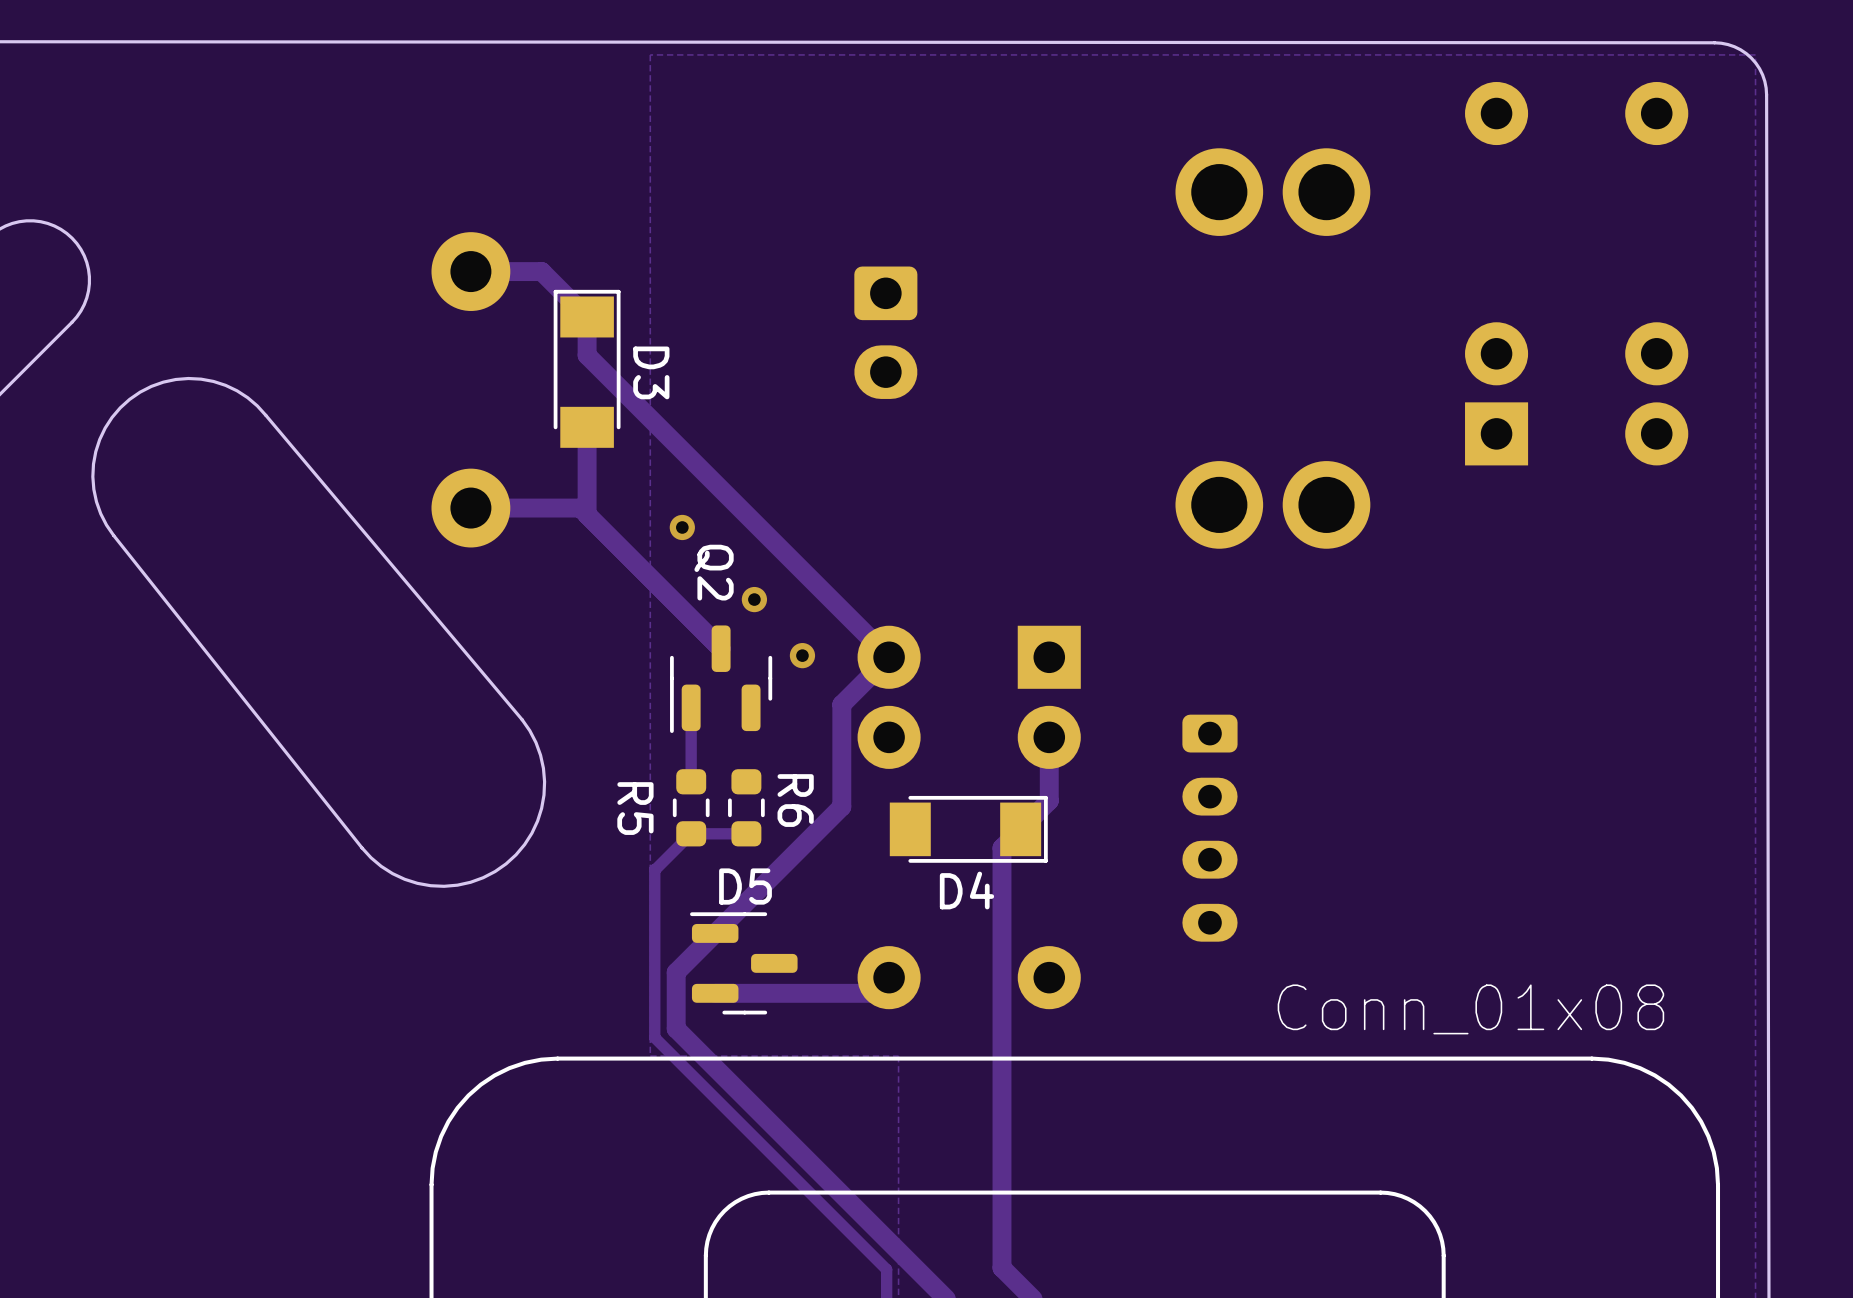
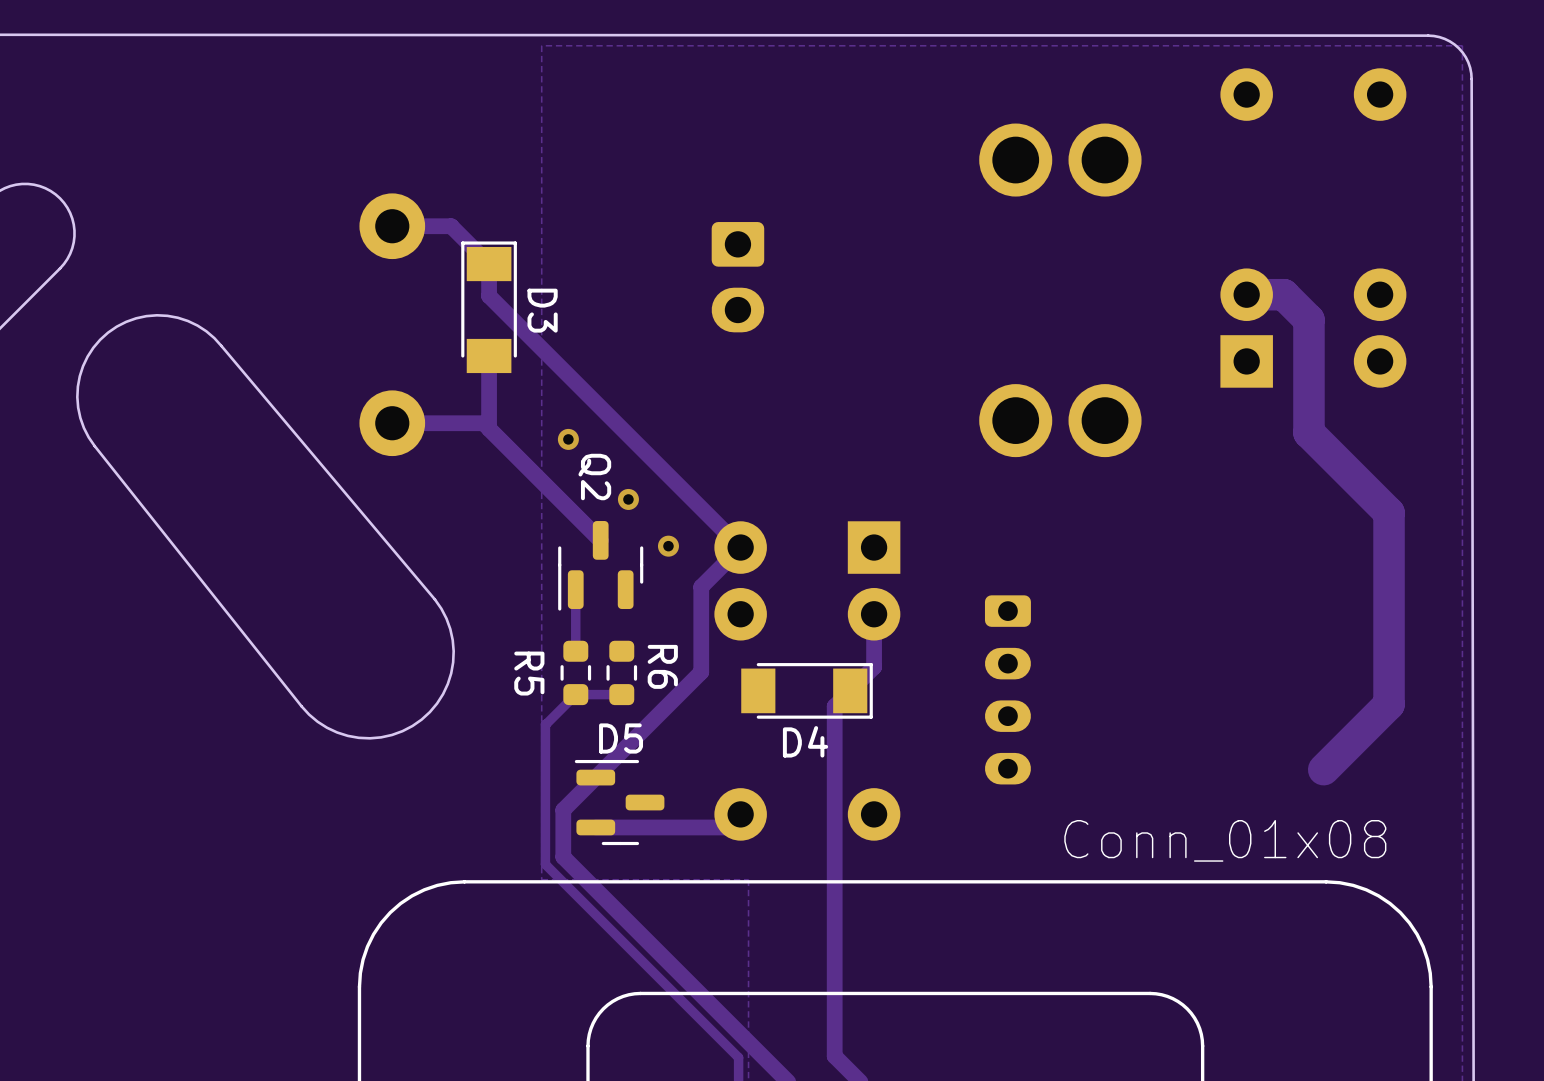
track: none -> (1246, 294) (1283, 294) (1308, 319) (1308, 432) (1389, 512) (1389, 704) (1323, 769)

